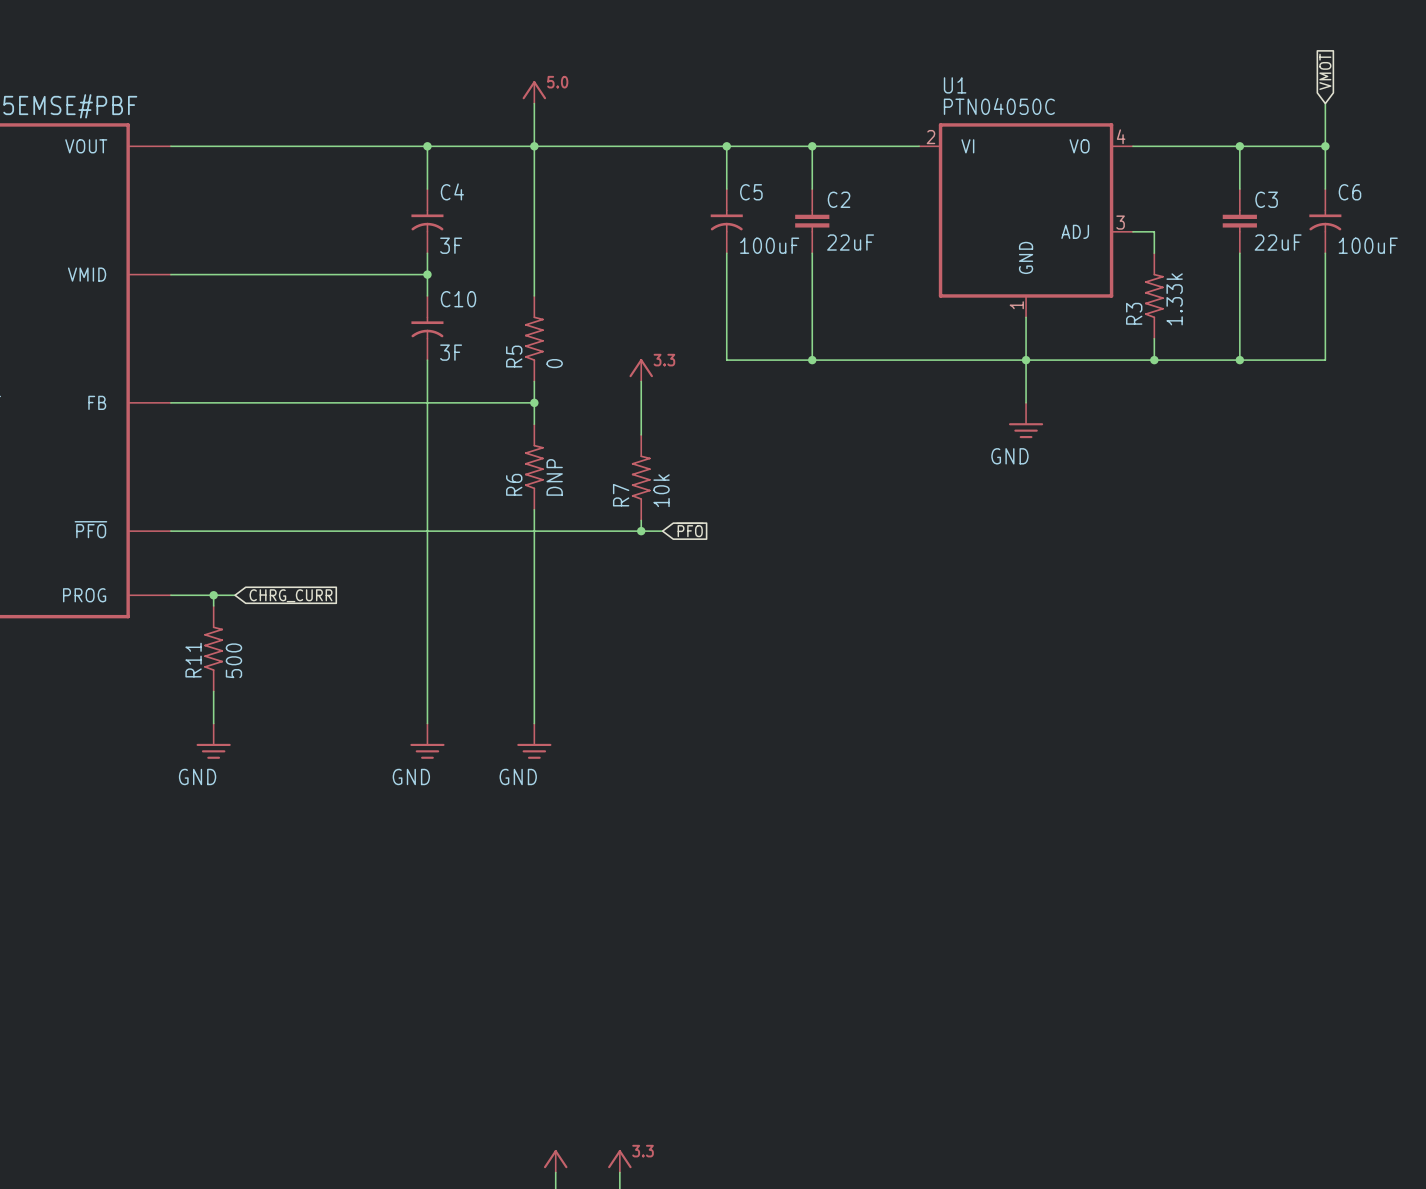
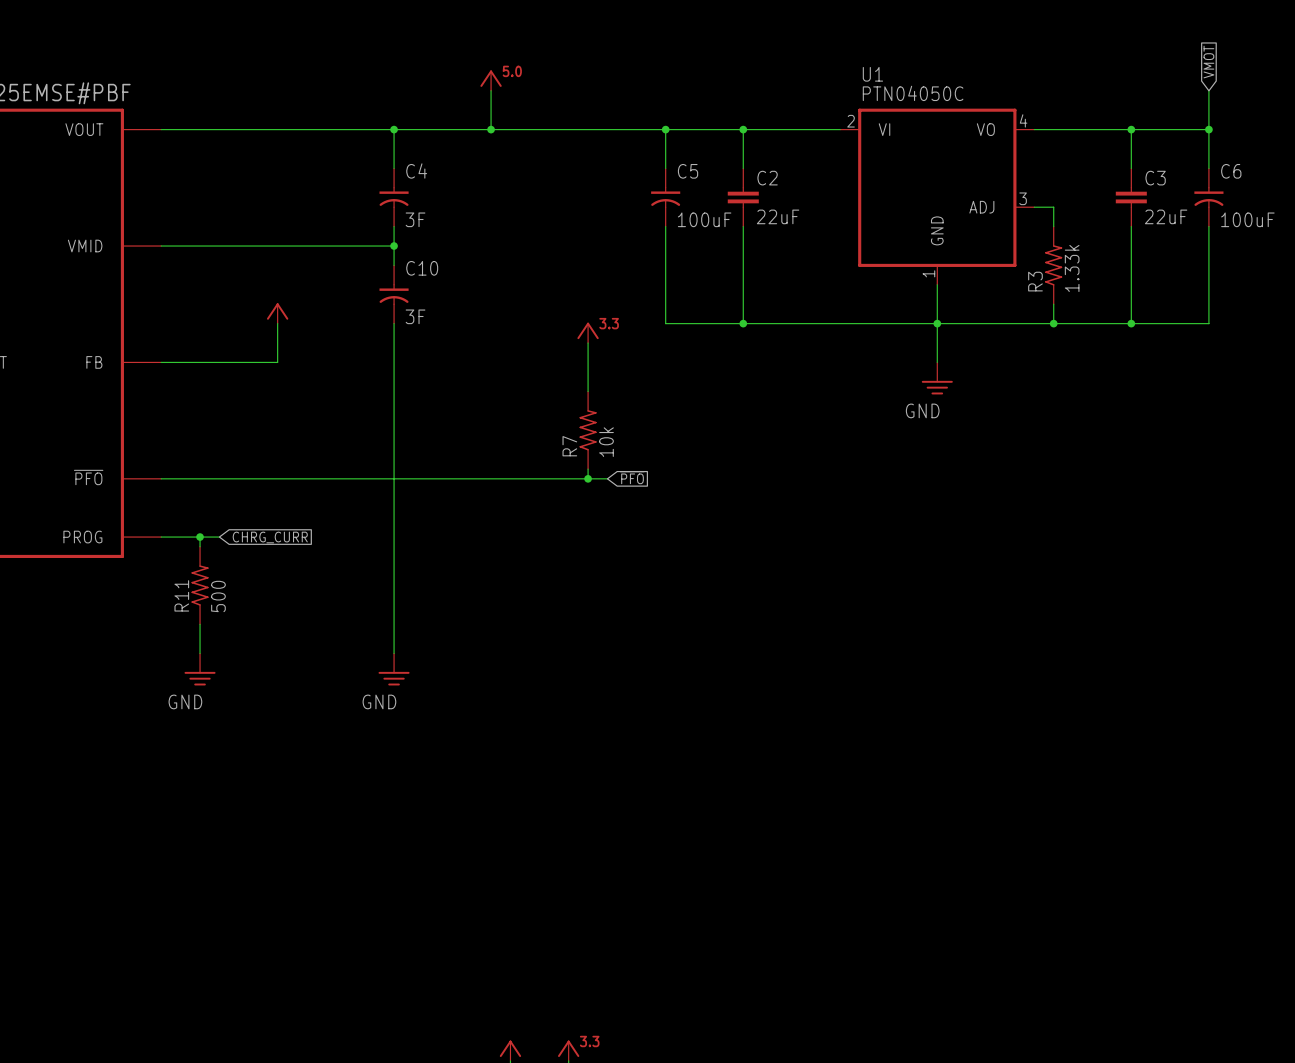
wire: (534, 146) (534, 295) -> none
R5: 0 (534, 338) -> none
power symbol: none -> (277, 313)
wire: (534, 381) (534, 424) -> none
wire: (299, 402) (534, 402) -> (277, 362) (277, 323)
junction: (534, 402) -> none
R6: DNP (534, 467) -> none
wire: (534, 509) (534, 723) -> none
power symbol: GND (534, 741) -> none

